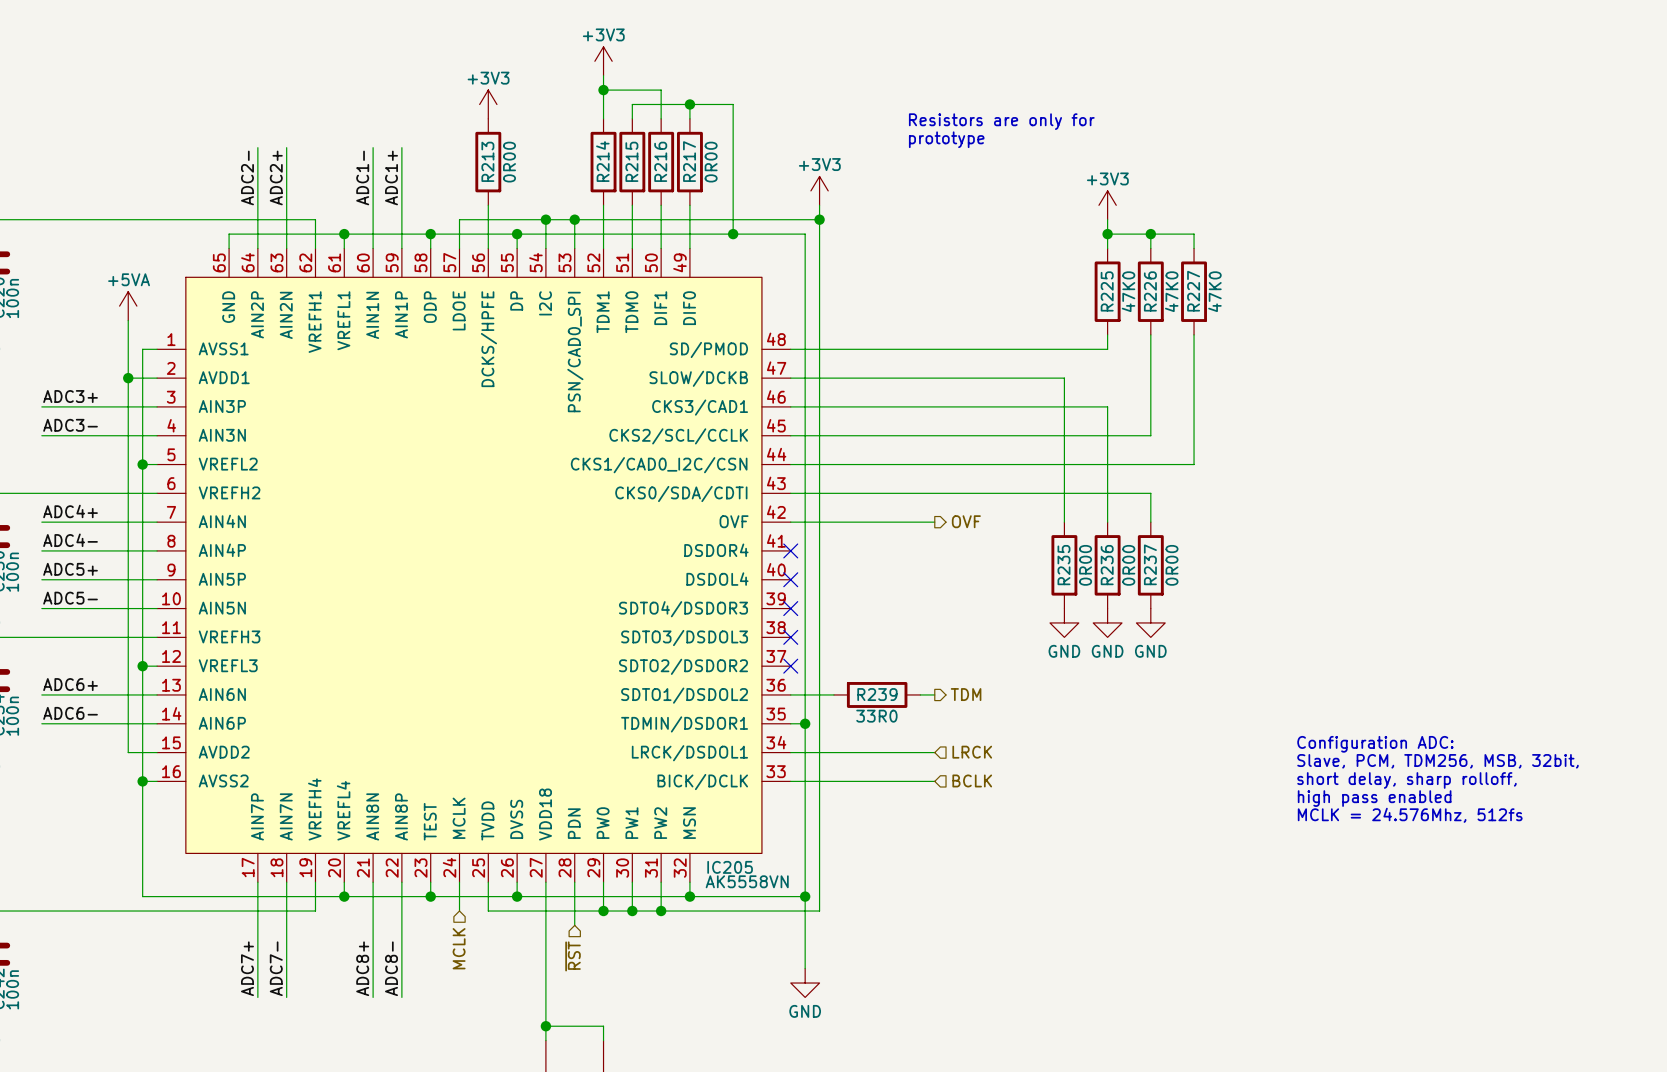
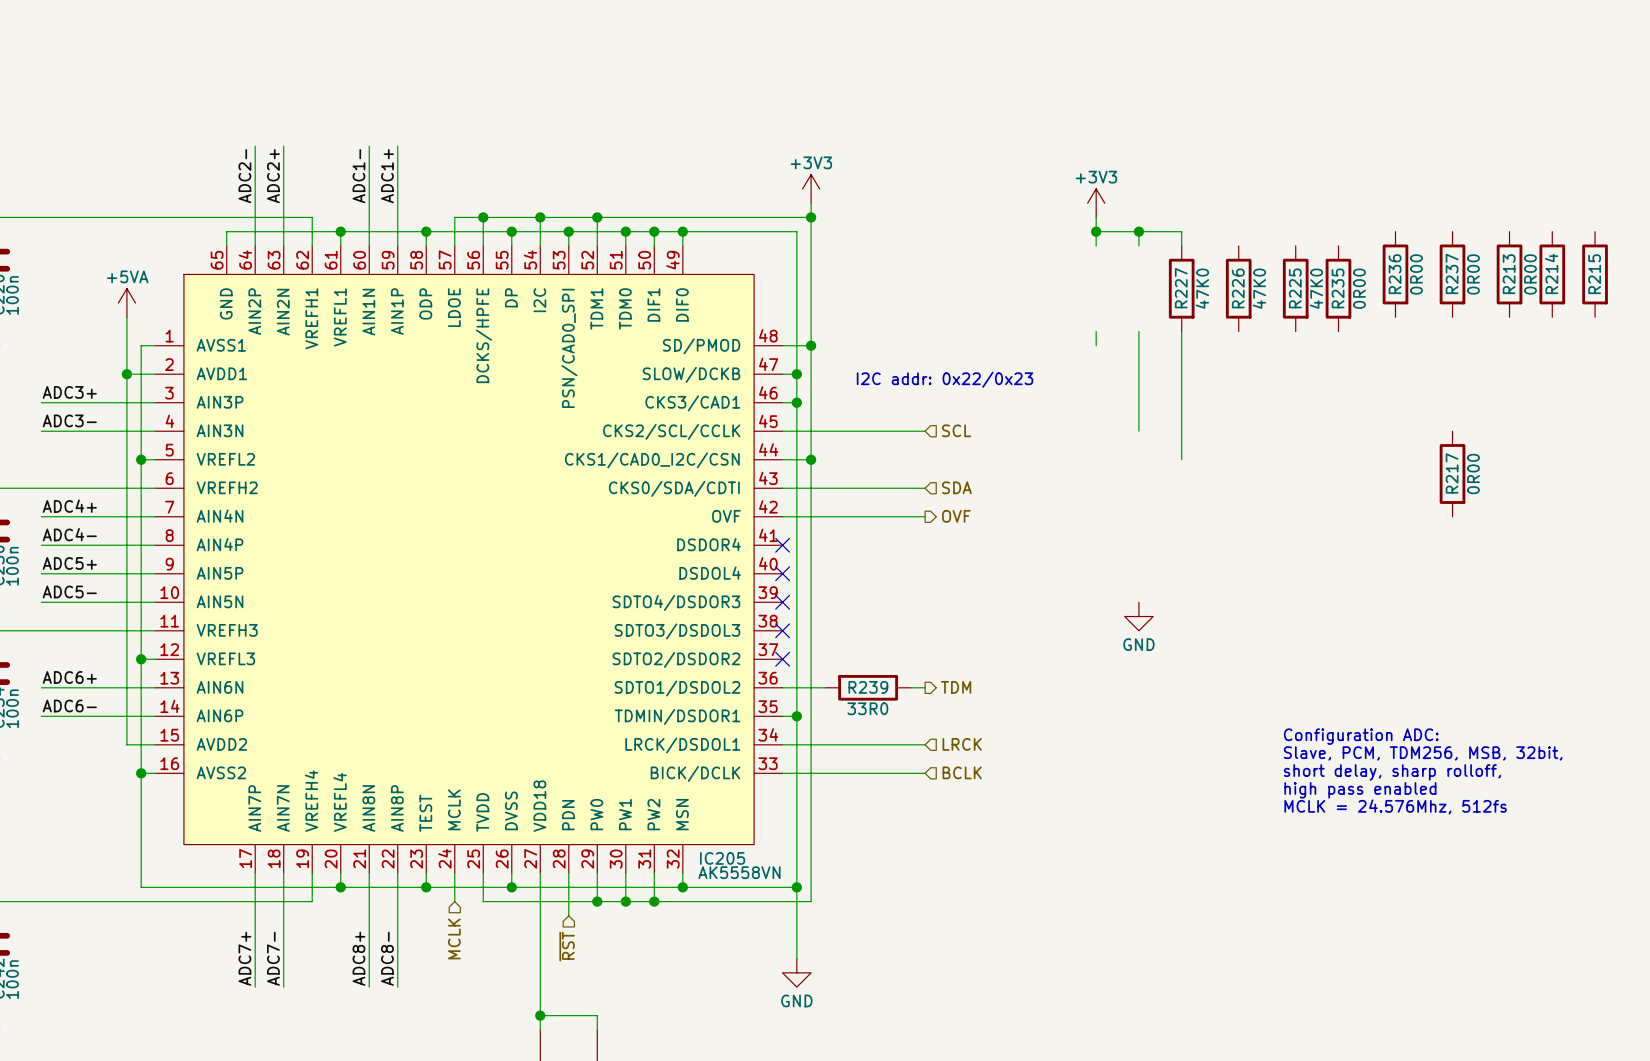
power symbol: +3V3 (603, 61) -> none
wire: (603, 75) (603, 118) -> none
wire: (603, 90) (661, 90) (661, 118) -> none
junction: (603, 90) -> none
power symbol: +3V3 (488, 104) -> none
wire: (689, 104) (689, 118) -> none
junction: (689, 104) -> none
wire: (632, 118) (632, 104) (733, 104) (733, 234) -> none
text: Resistors are only for (1001, 121) -> none
text: prototype (946, 139) -> none
R213 position: (488, 162) -> (1509, 274)
R214 position: (603, 162) -> (1552, 274)
R215 position: (632, 162) -> (1595, 274)
R216: (661, 162) -> none
R217 position: (689, 162) -> (1452, 473)
wire: (488, 205) (488, 219) -> none
wire: (603, 205) (603, 219) -> none
wire: (632, 205) (632, 234) -> none
wire: (661, 205) (661, 234) -> none
wire: (689, 205) (689, 234) -> none
junction: none -> (483, 217)
wire: (574, 219) (574, 234) -> none
junction: (574, 219) -> none
junction: none -> (597, 217)
junction: none -> (568, 231)
junction: none -> (625, 231)
junction: none -> (654, 231)
junction: none -> (682, 231)
junction: (733, 234) -> none
R225 position: (1107, 291) -> (1295, 288)
R226 position: (1150, 291) -> (1238, 288)
wire: (819, 349) (1107, 349) -> none
junction: none -> (811, 345)
wire: (805, 378) (1064, 378) (1064, 522) -> none
junction: none -> (796, 374)
text: none -> I2C addr: 0x22/0x23 (944, 379)
wire: (805, 406) (1107, 406) (1107, 522) -> none
junction: none -> (796, 402)
wire: (934, 435) (1150, 435) -> none
hierarchical label: none -> SCL (956, 430)
wire: (819, 464) (1194, 464) -> none
junction: none -> (811, 459)
hierarchical label: none -> SDA (956, 487)
wire: (934, 493) (1150, 493) (1150, 522) -> none
R235 position: (1064, 565) -> (1338, 288)
R236 position: (1107, 565) -> (1395, 274)
R237 position: (1150, 565) -> (1452, 274)
power symbol: GND (1064, 622) -> none
power symbol: GND (1107, 622) -> none

